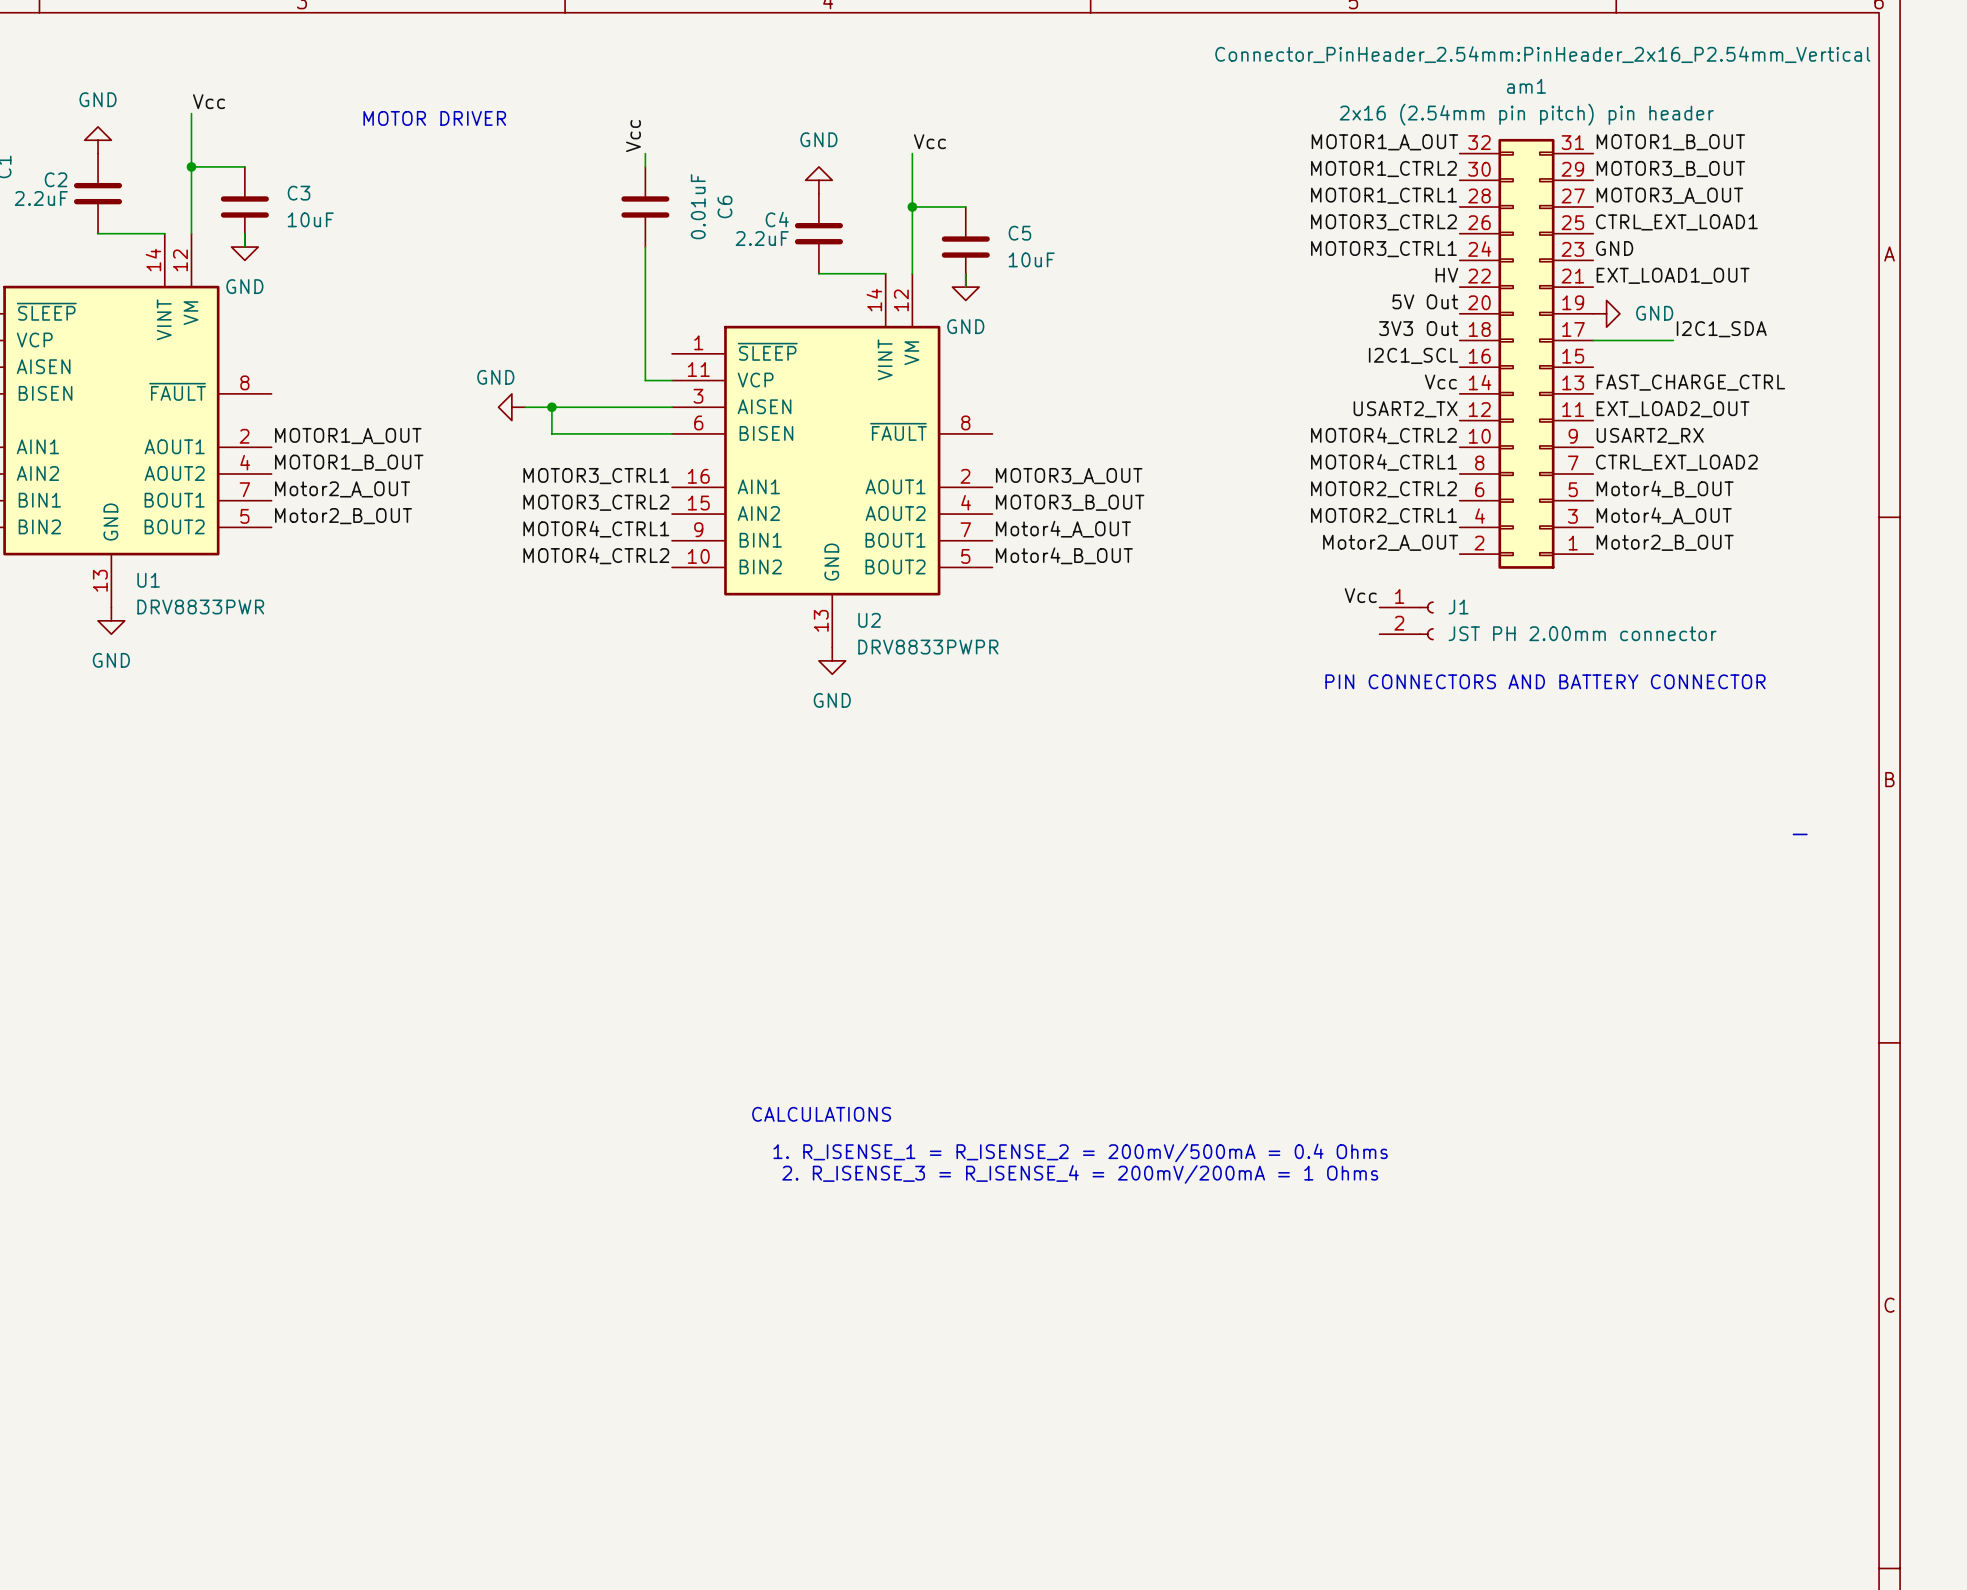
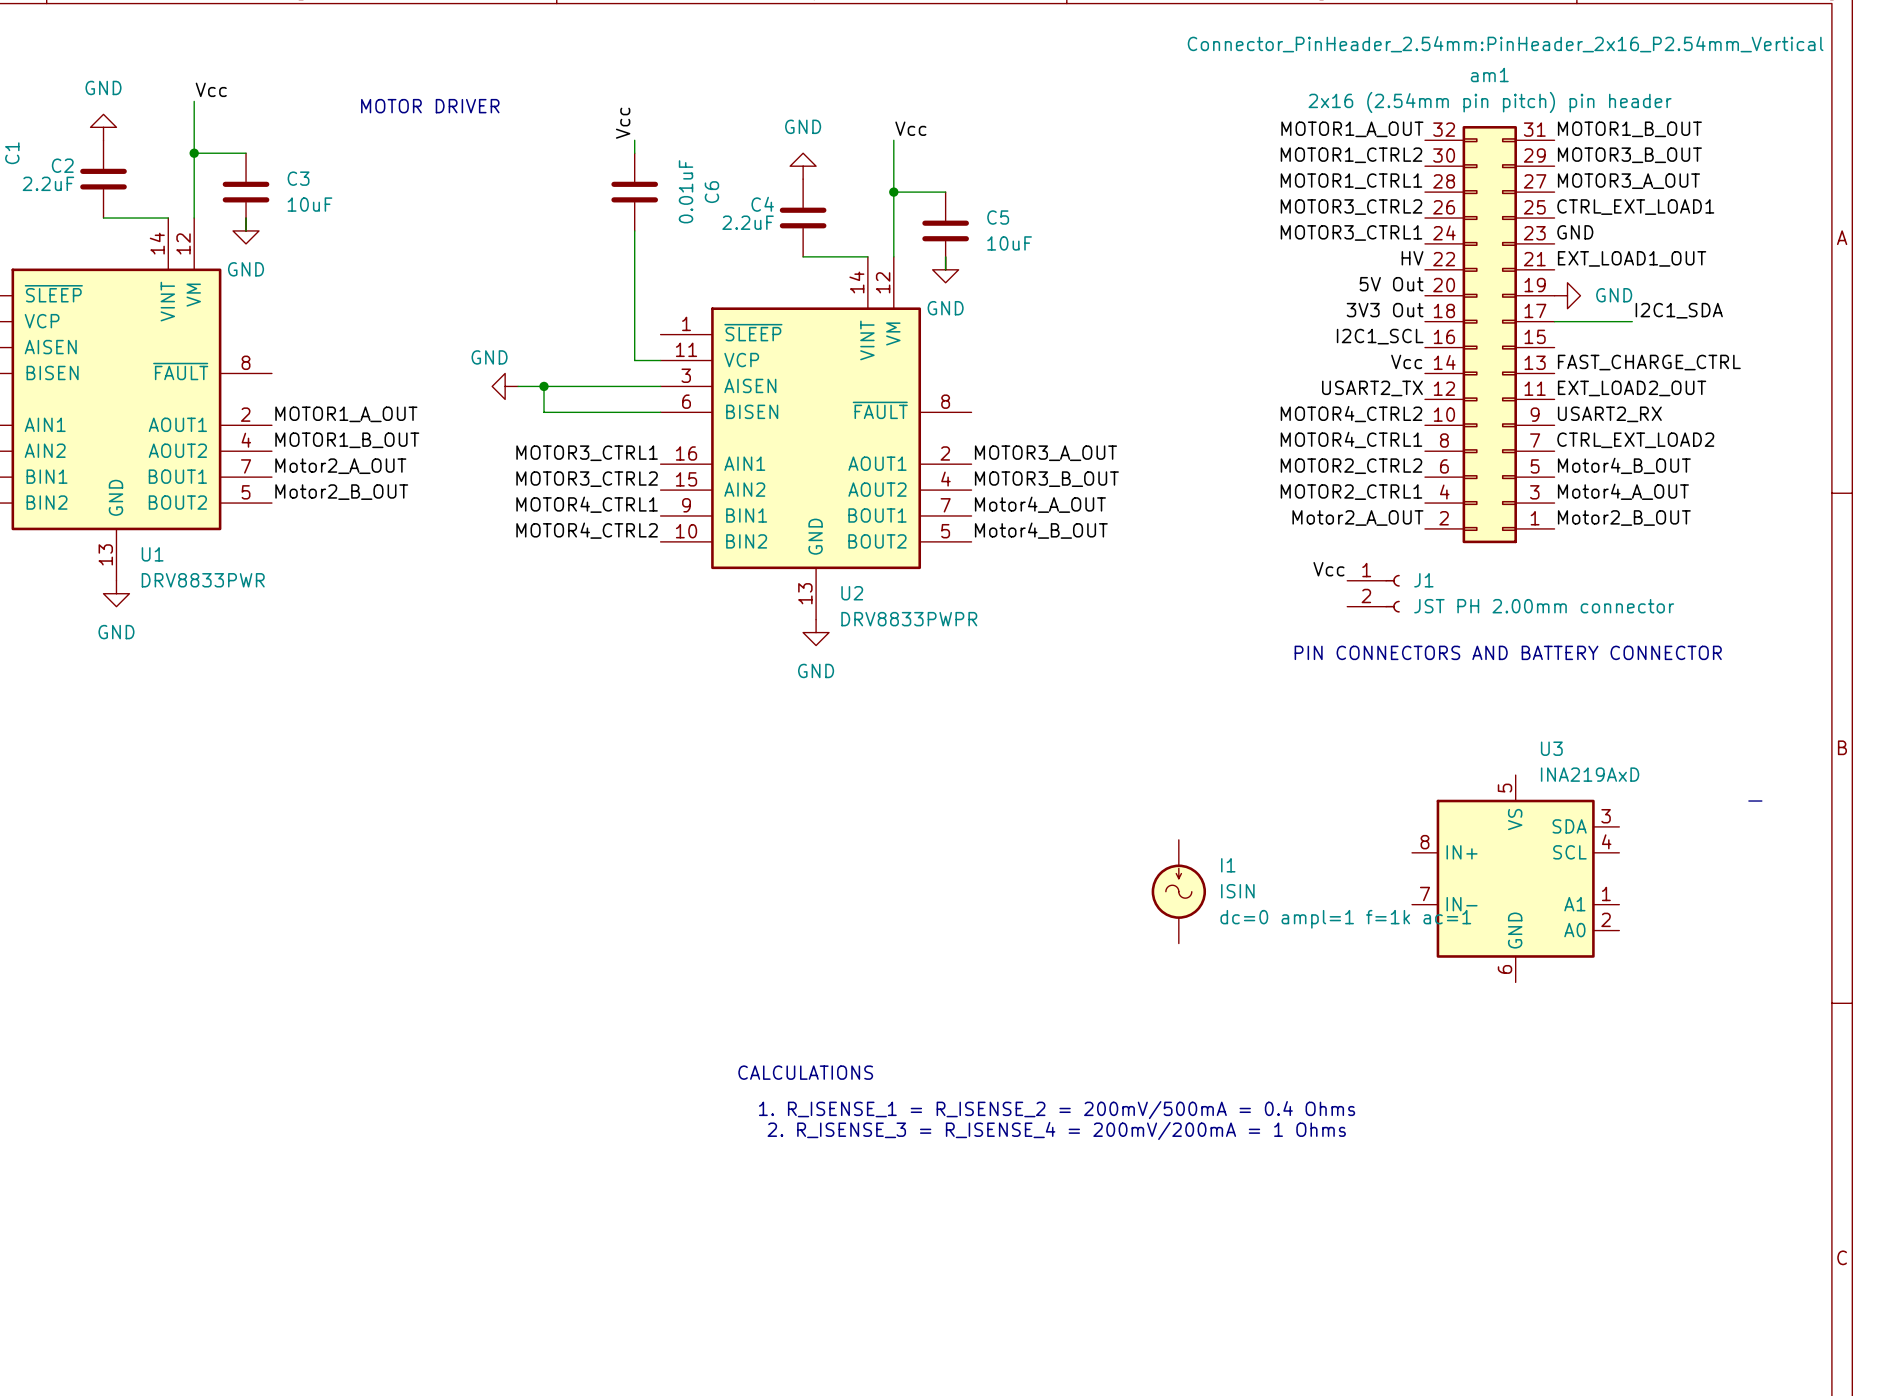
U3: none -> INA219AxD (1515, 878)
I1: none -> ISIN (1178, 891)

